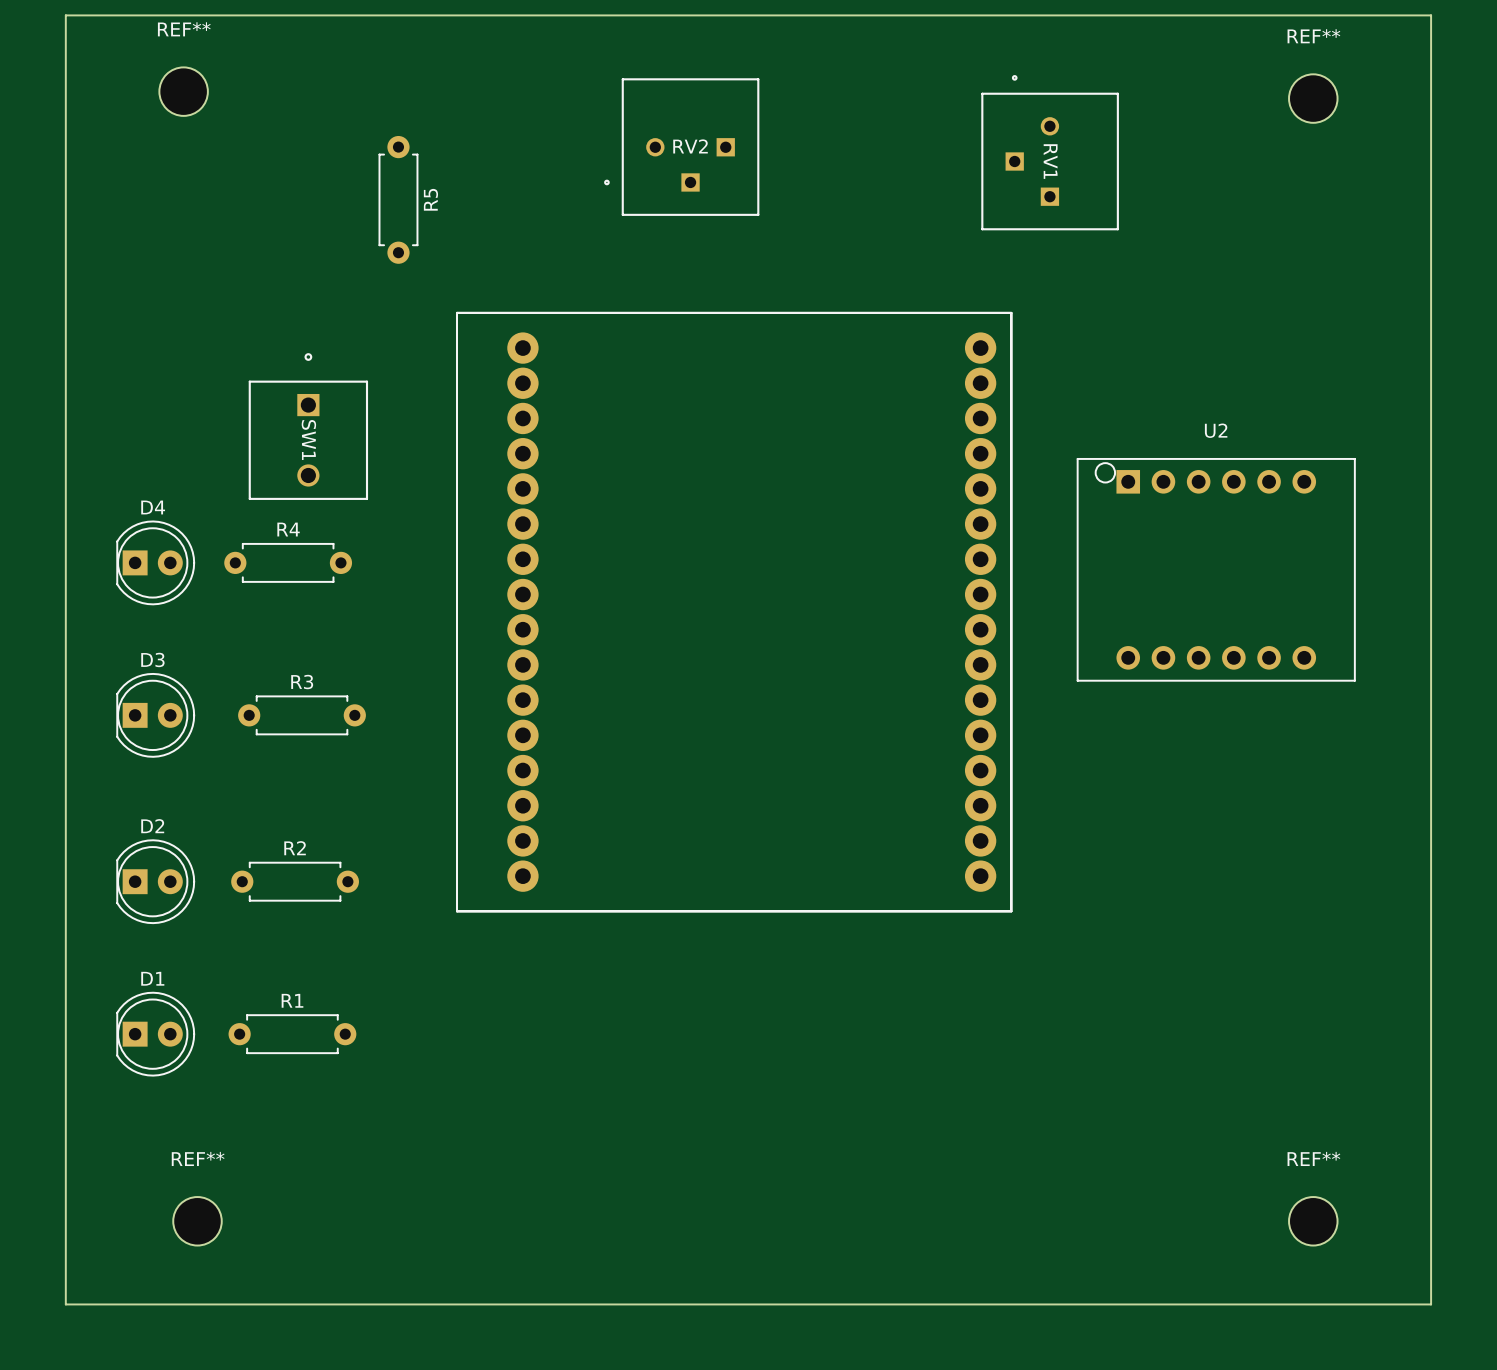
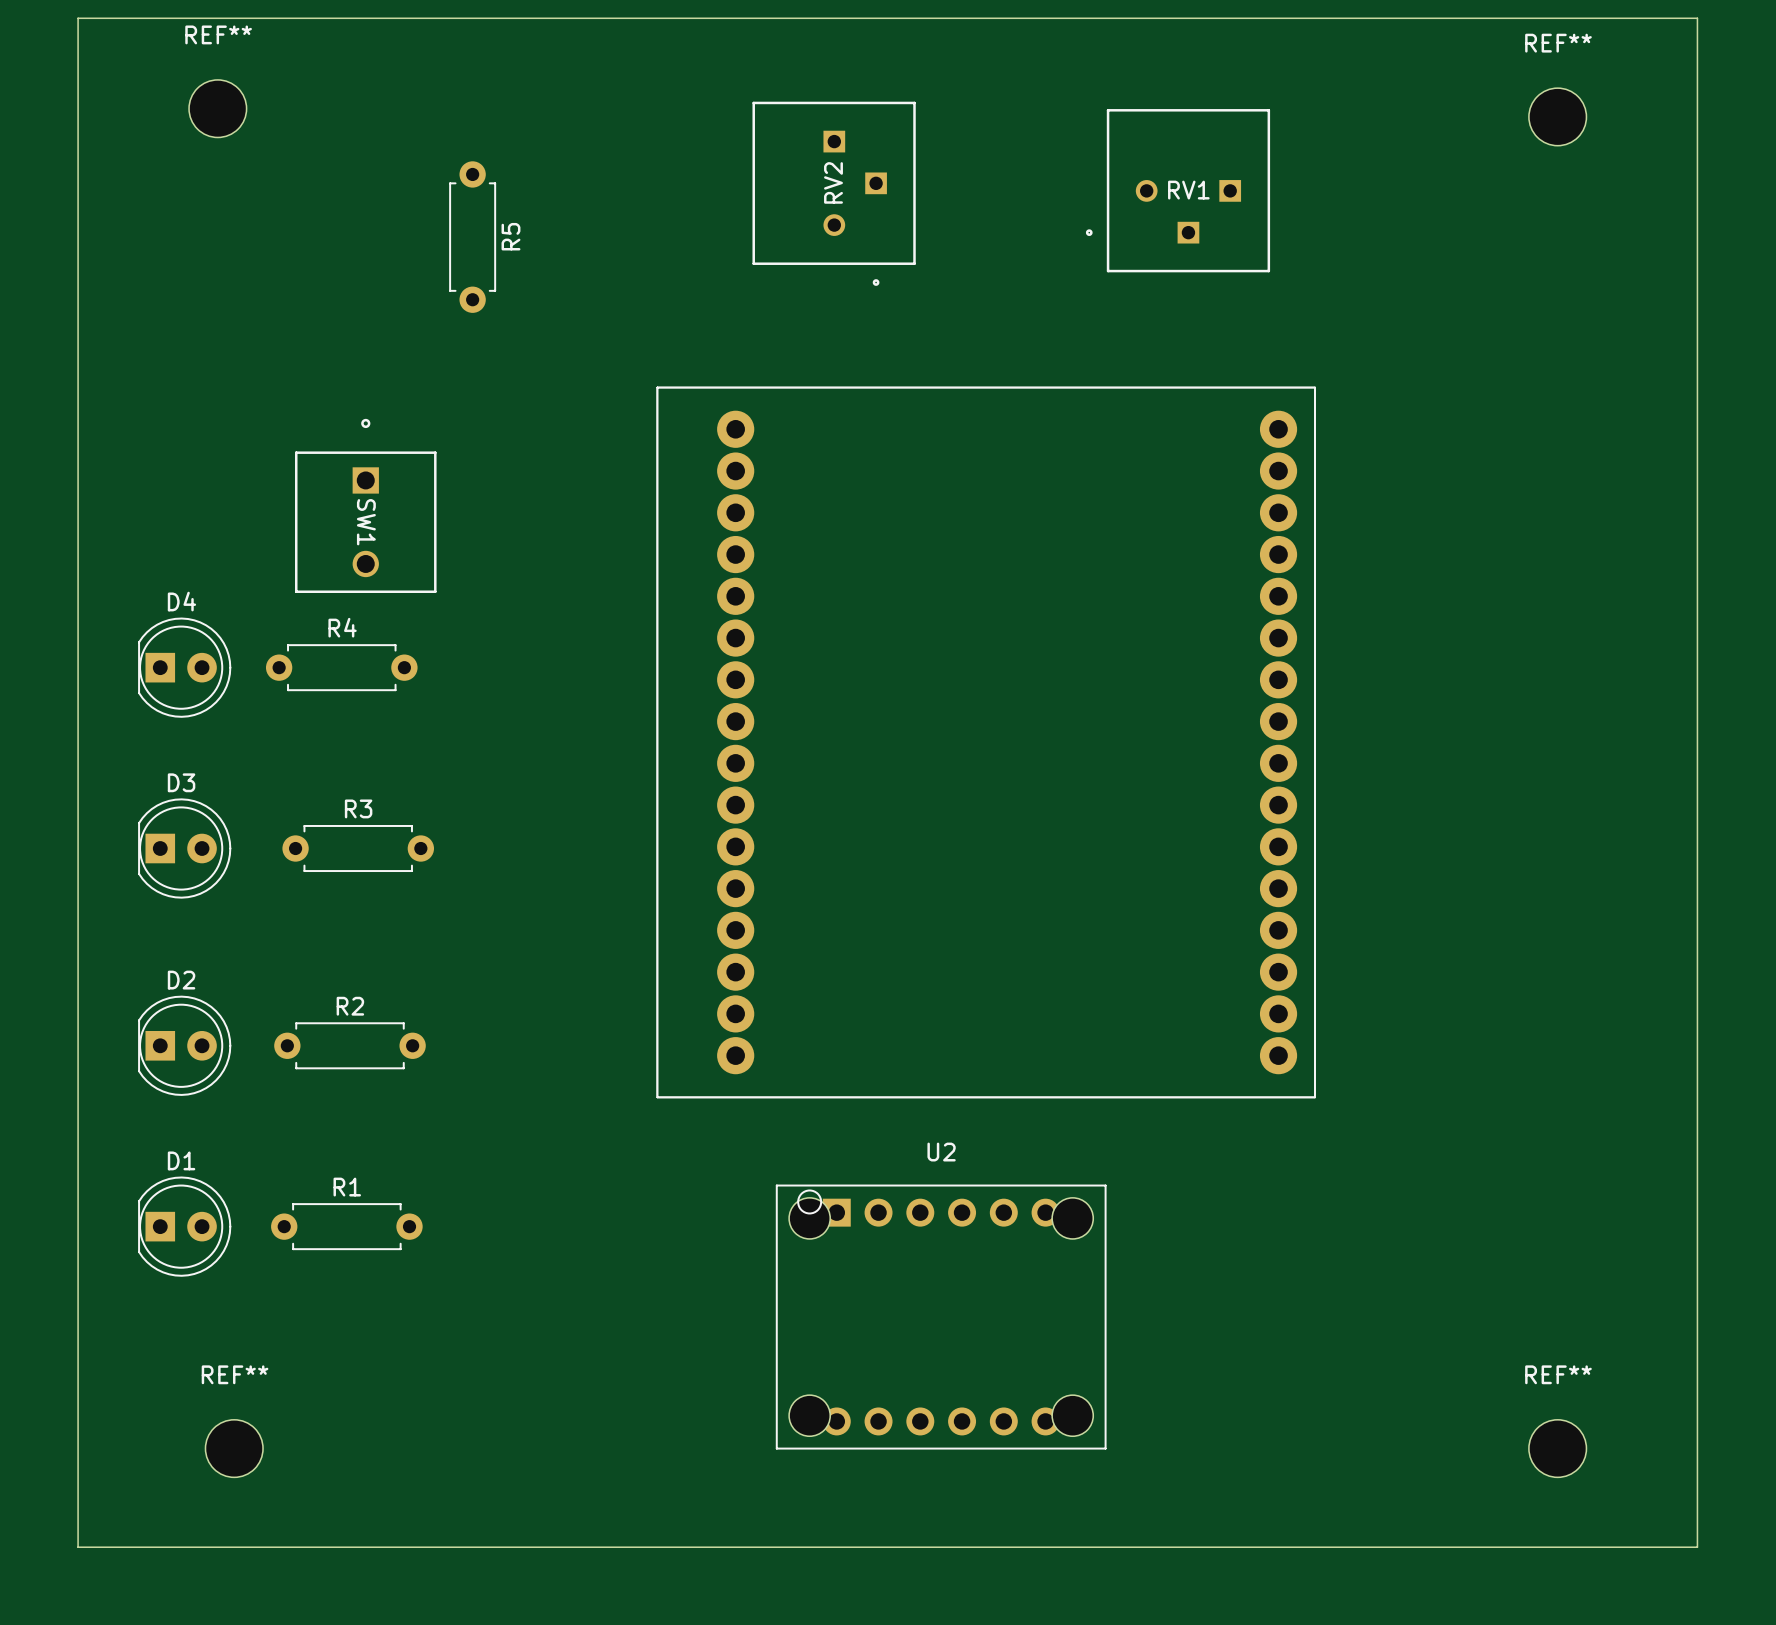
RV2 rotation: 0° (681, 147) -> 90° counterclockwise (834, 193)
RV1 rotation: 0° (1050, 152) -> 90° counterclockwise (1178, 190)
U2 footprint: [1076, 458, 1356, 682] -> [775, 1184, 1107, 1450]
part position: (734, 612) -> (986, 742)

